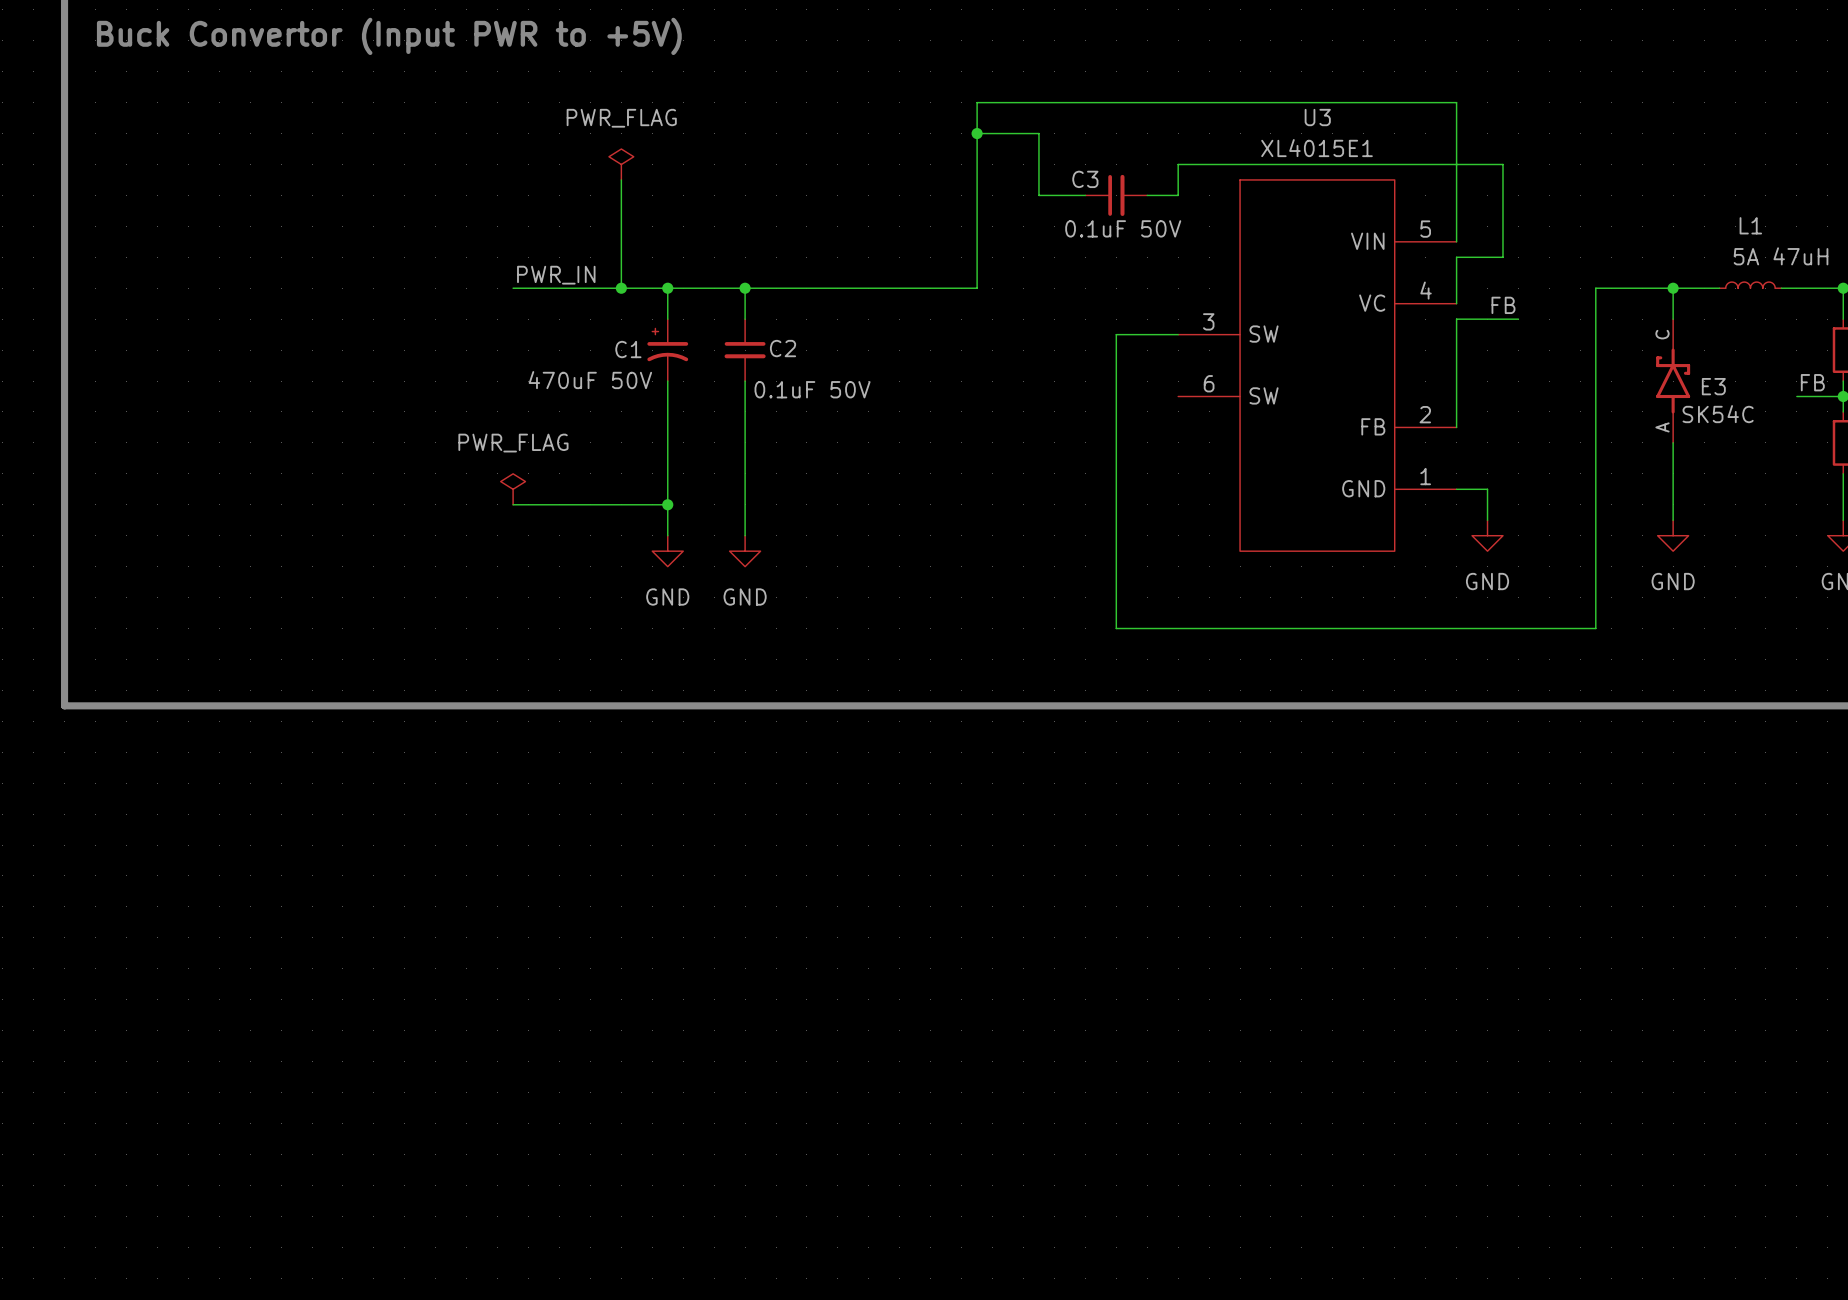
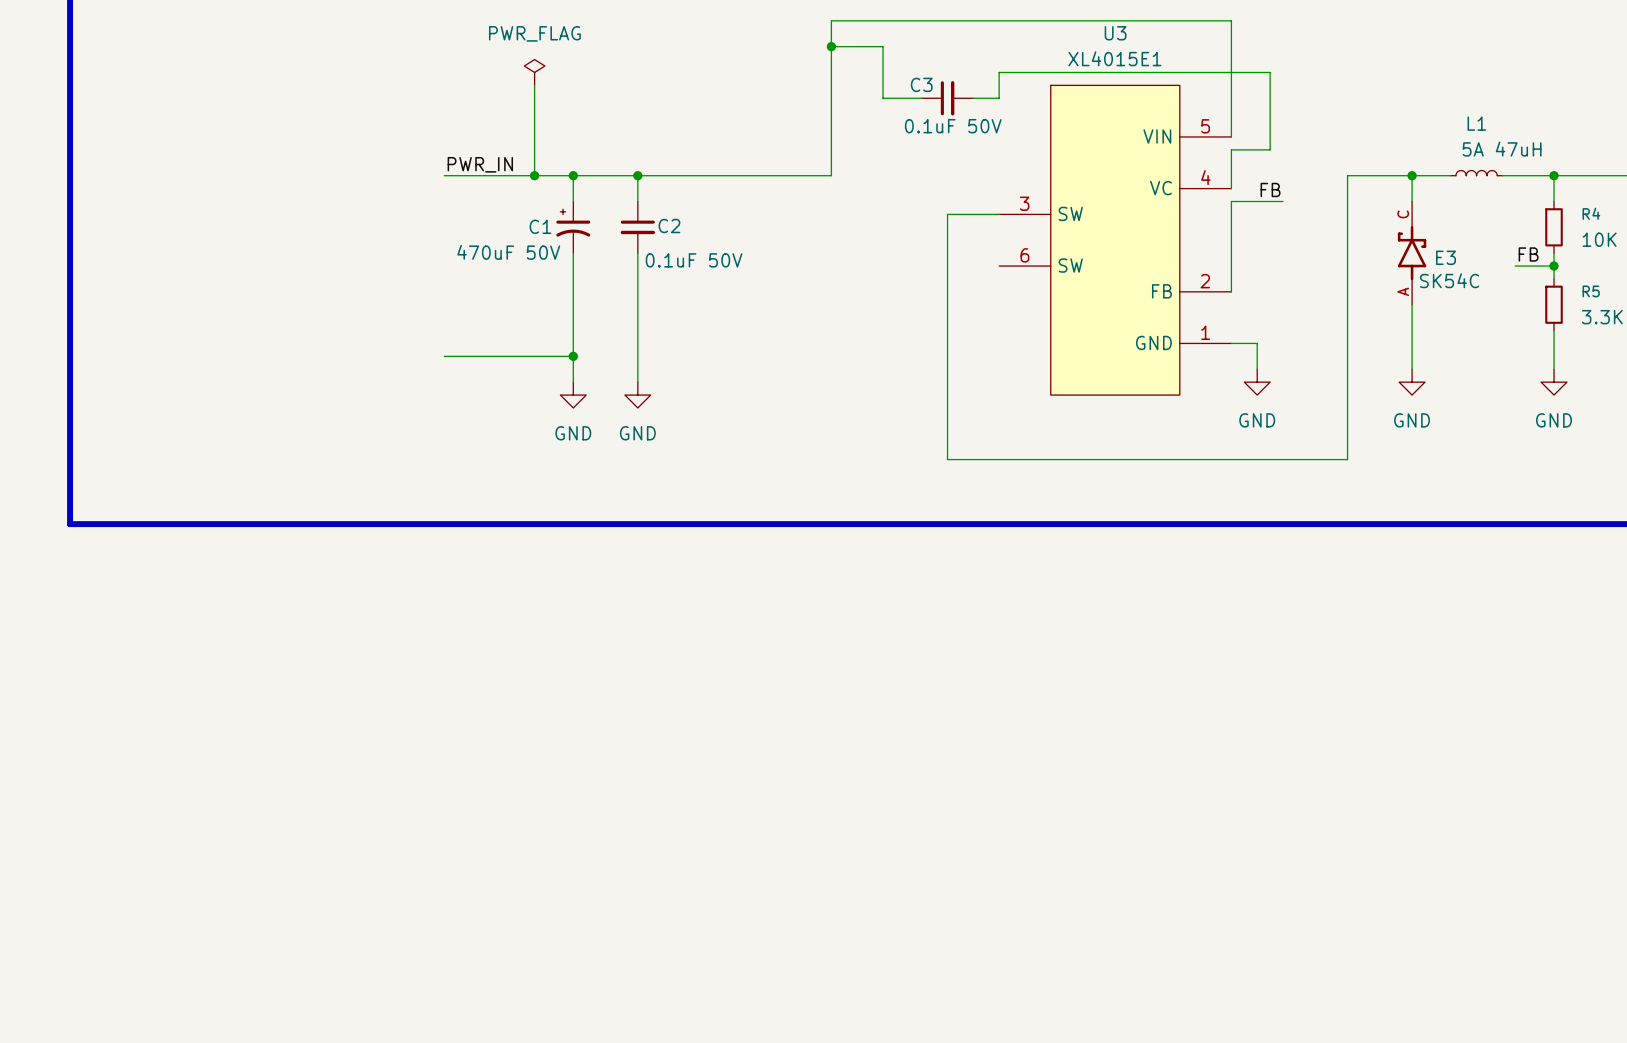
power symbol: PWR_FLAG (513, 489) -> none

